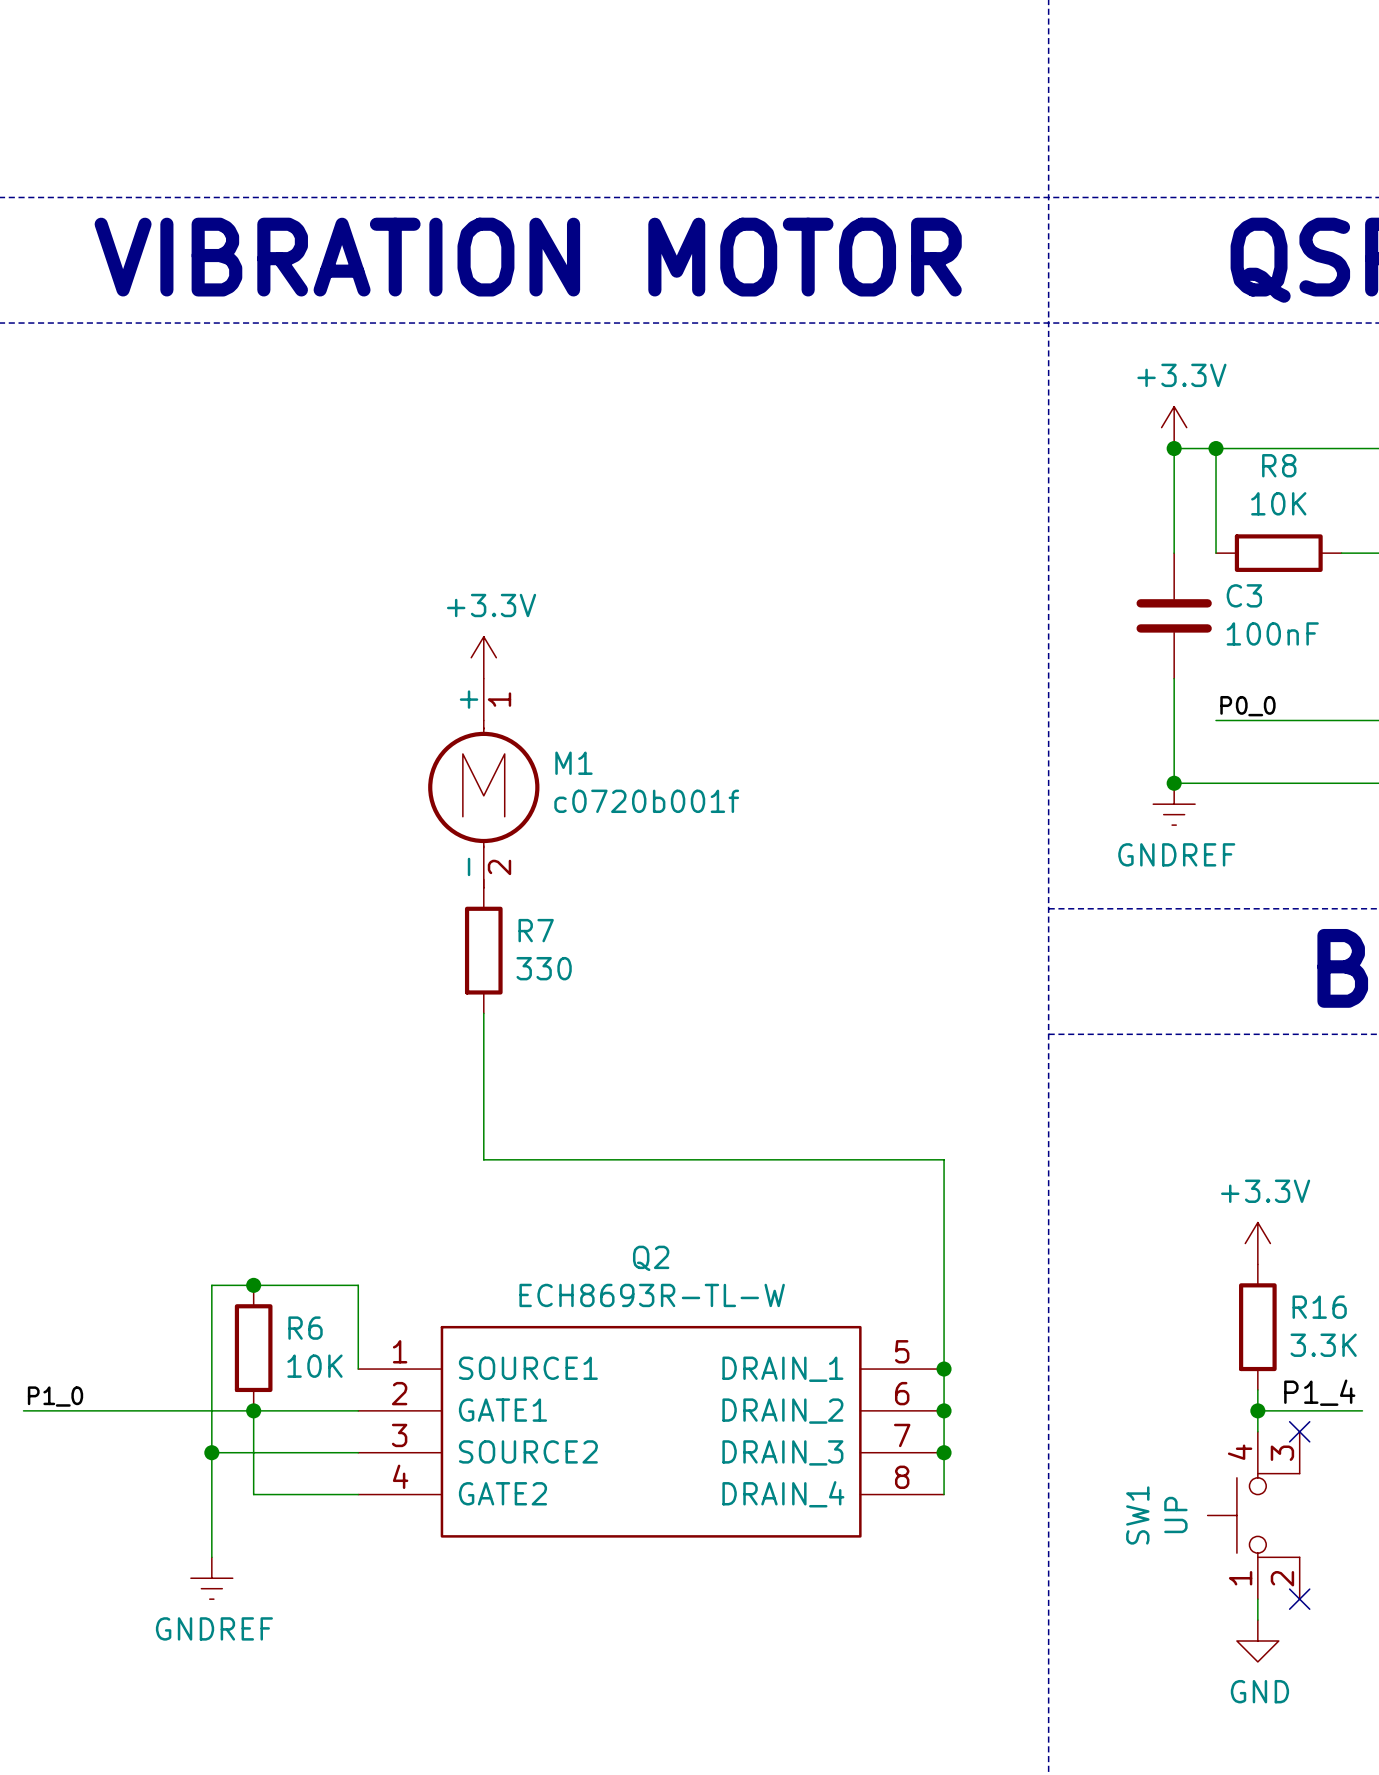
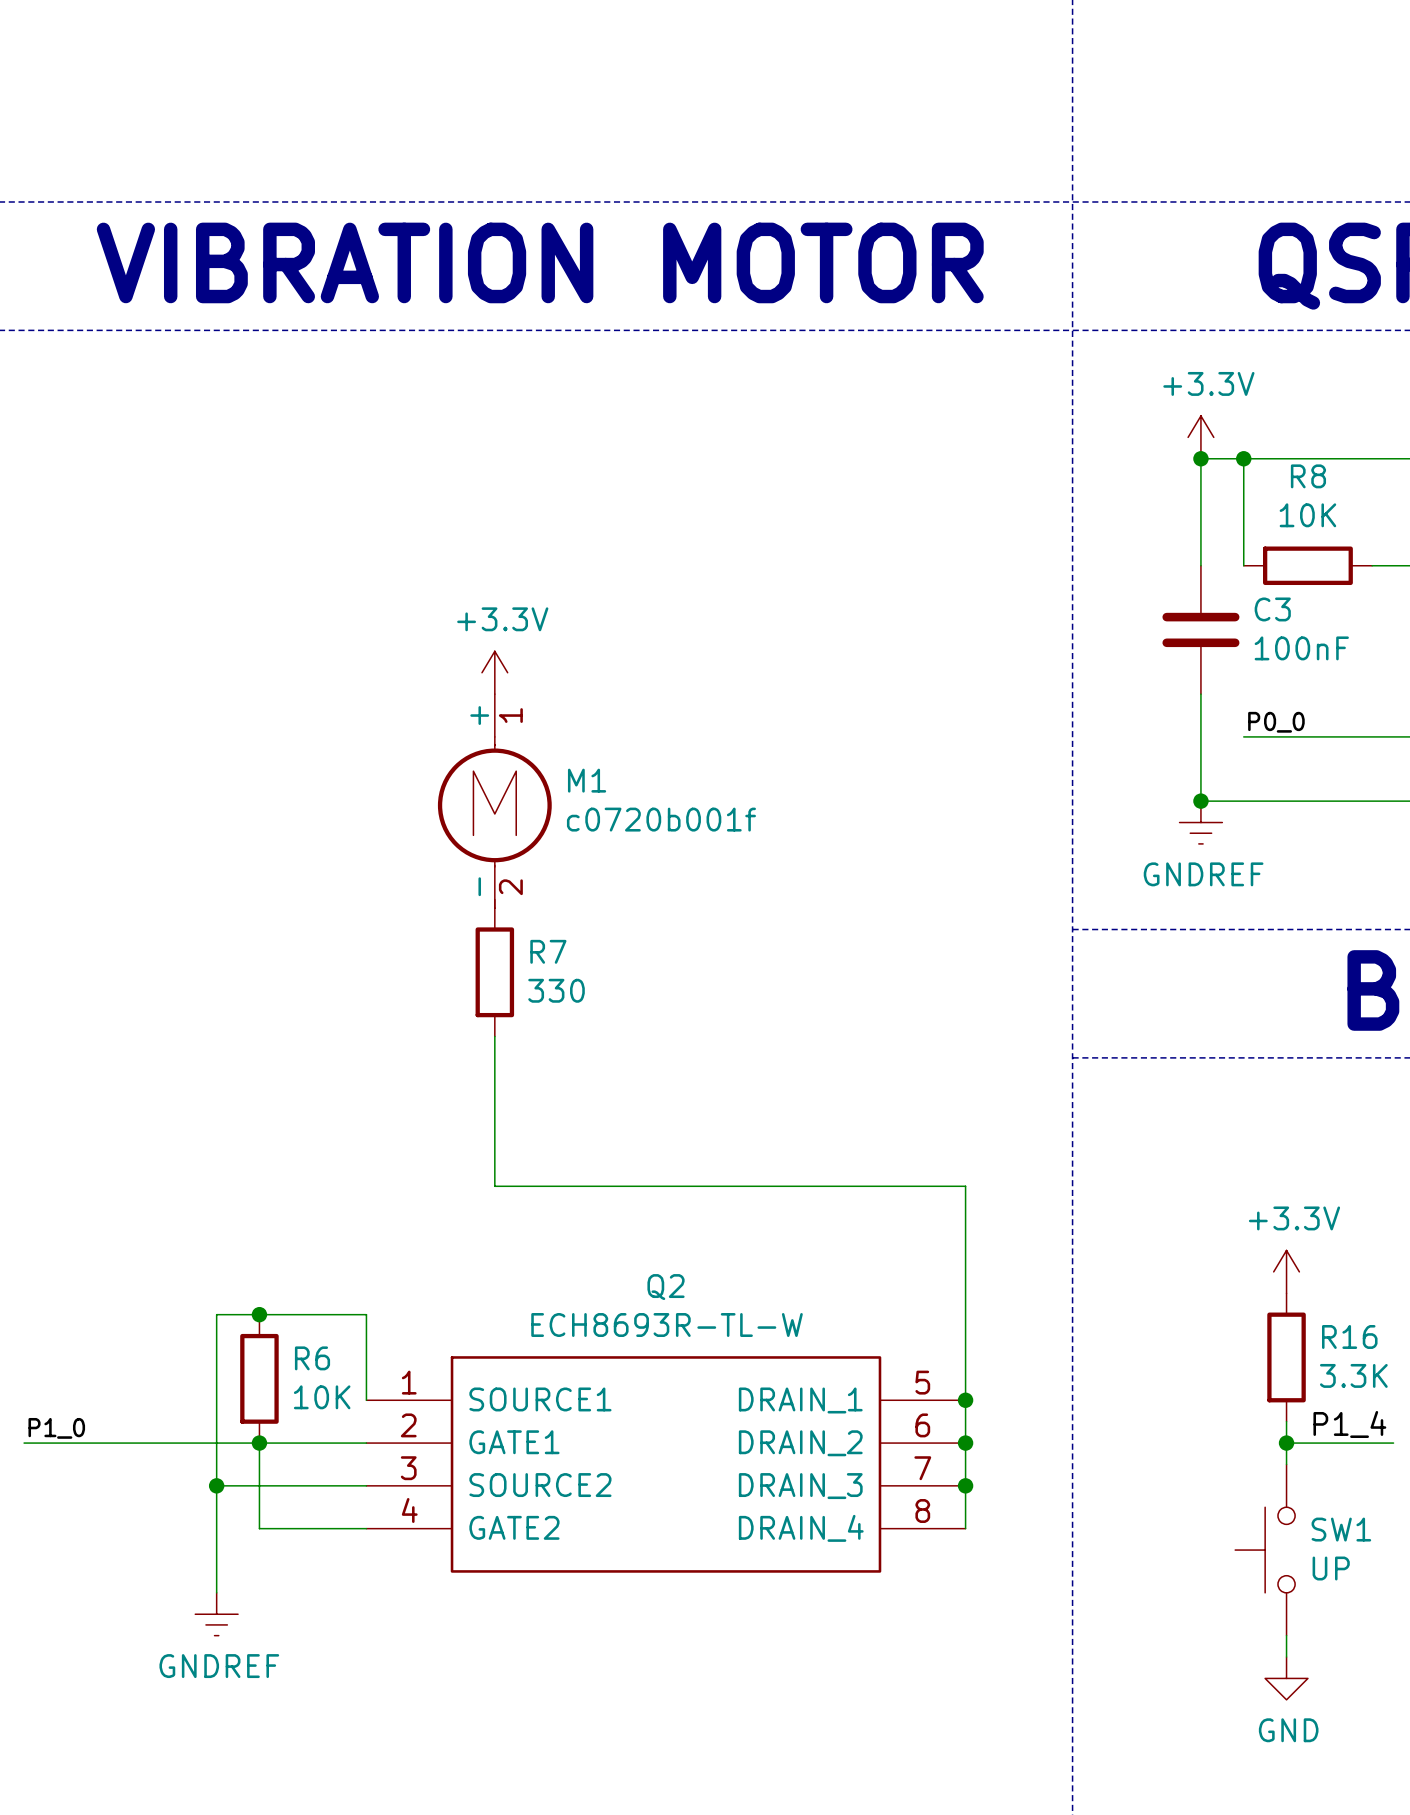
SW1 symbol: [1207, 1431, 1300, 1600] -> [1235, 1464, 1296, 1636]
no-connect mark: (1299, 1431) -> none
SW1 value position: UP (1175, 1514) -> UP (1331, 1568)
SW1 name position: SW1 (1137, 1515) -> SW1 (1341, 1529)
no-connect mark: (1299, 1599) -> none

